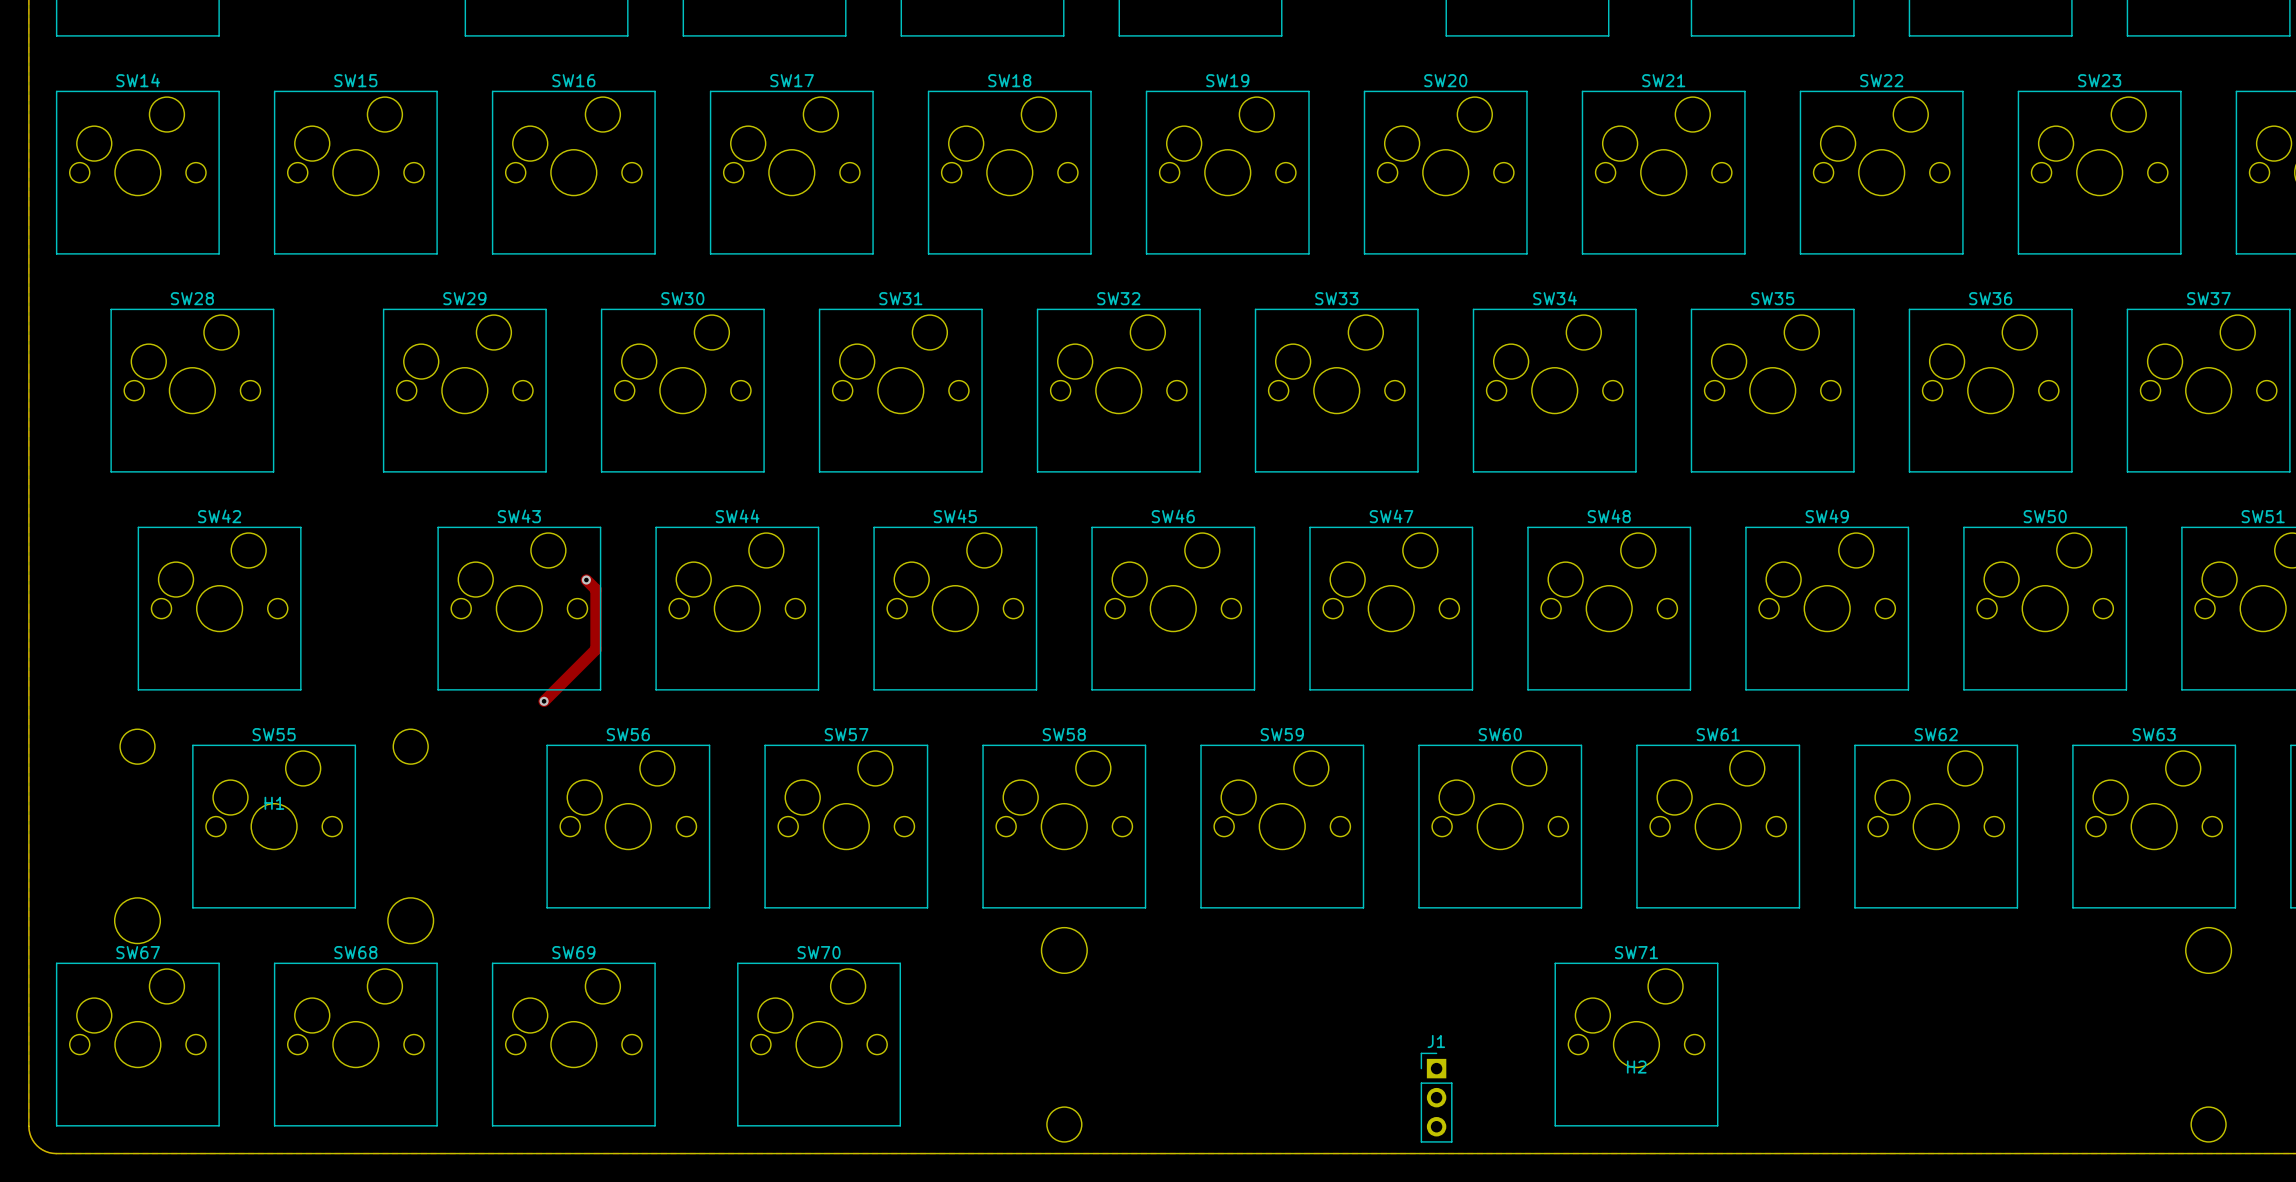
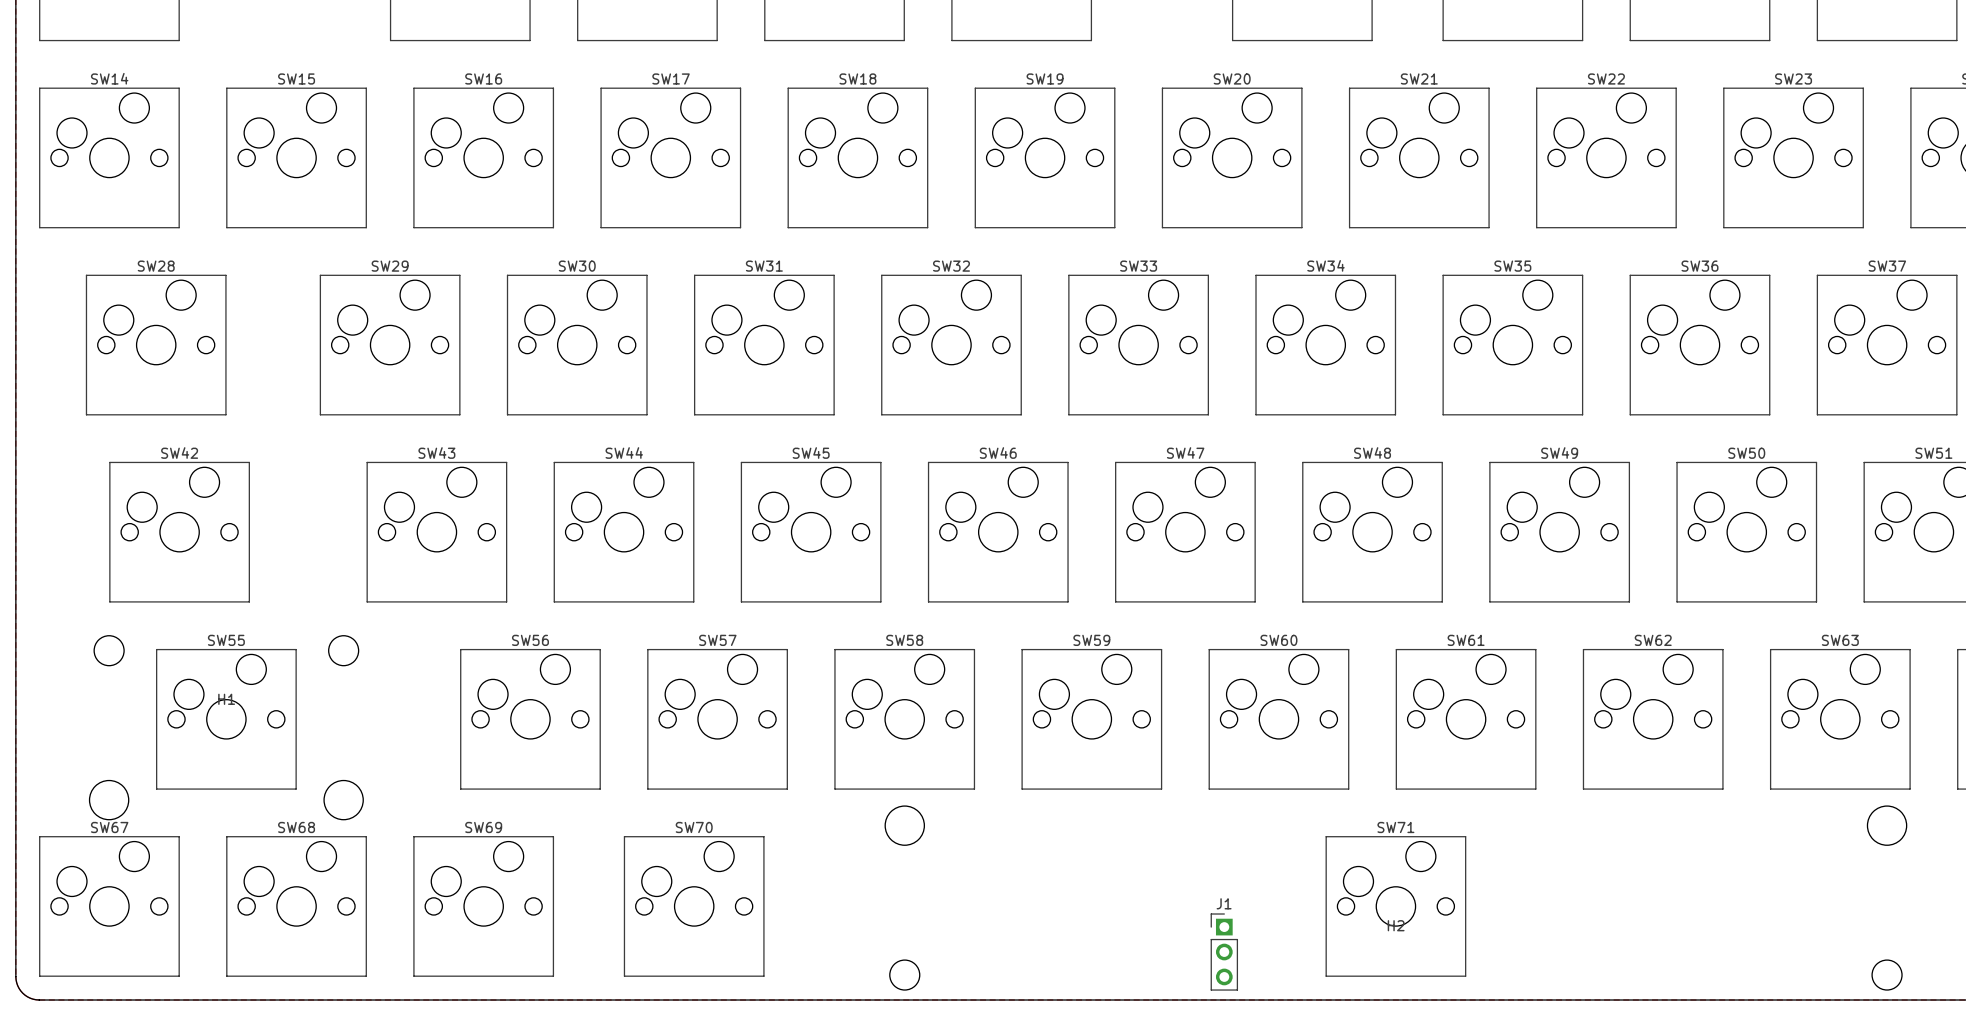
track: (586, 580) (596, 589) (596, 649) (544, 701) -> none
via: (586, 580) -> none
via: (544, 701) -> none

